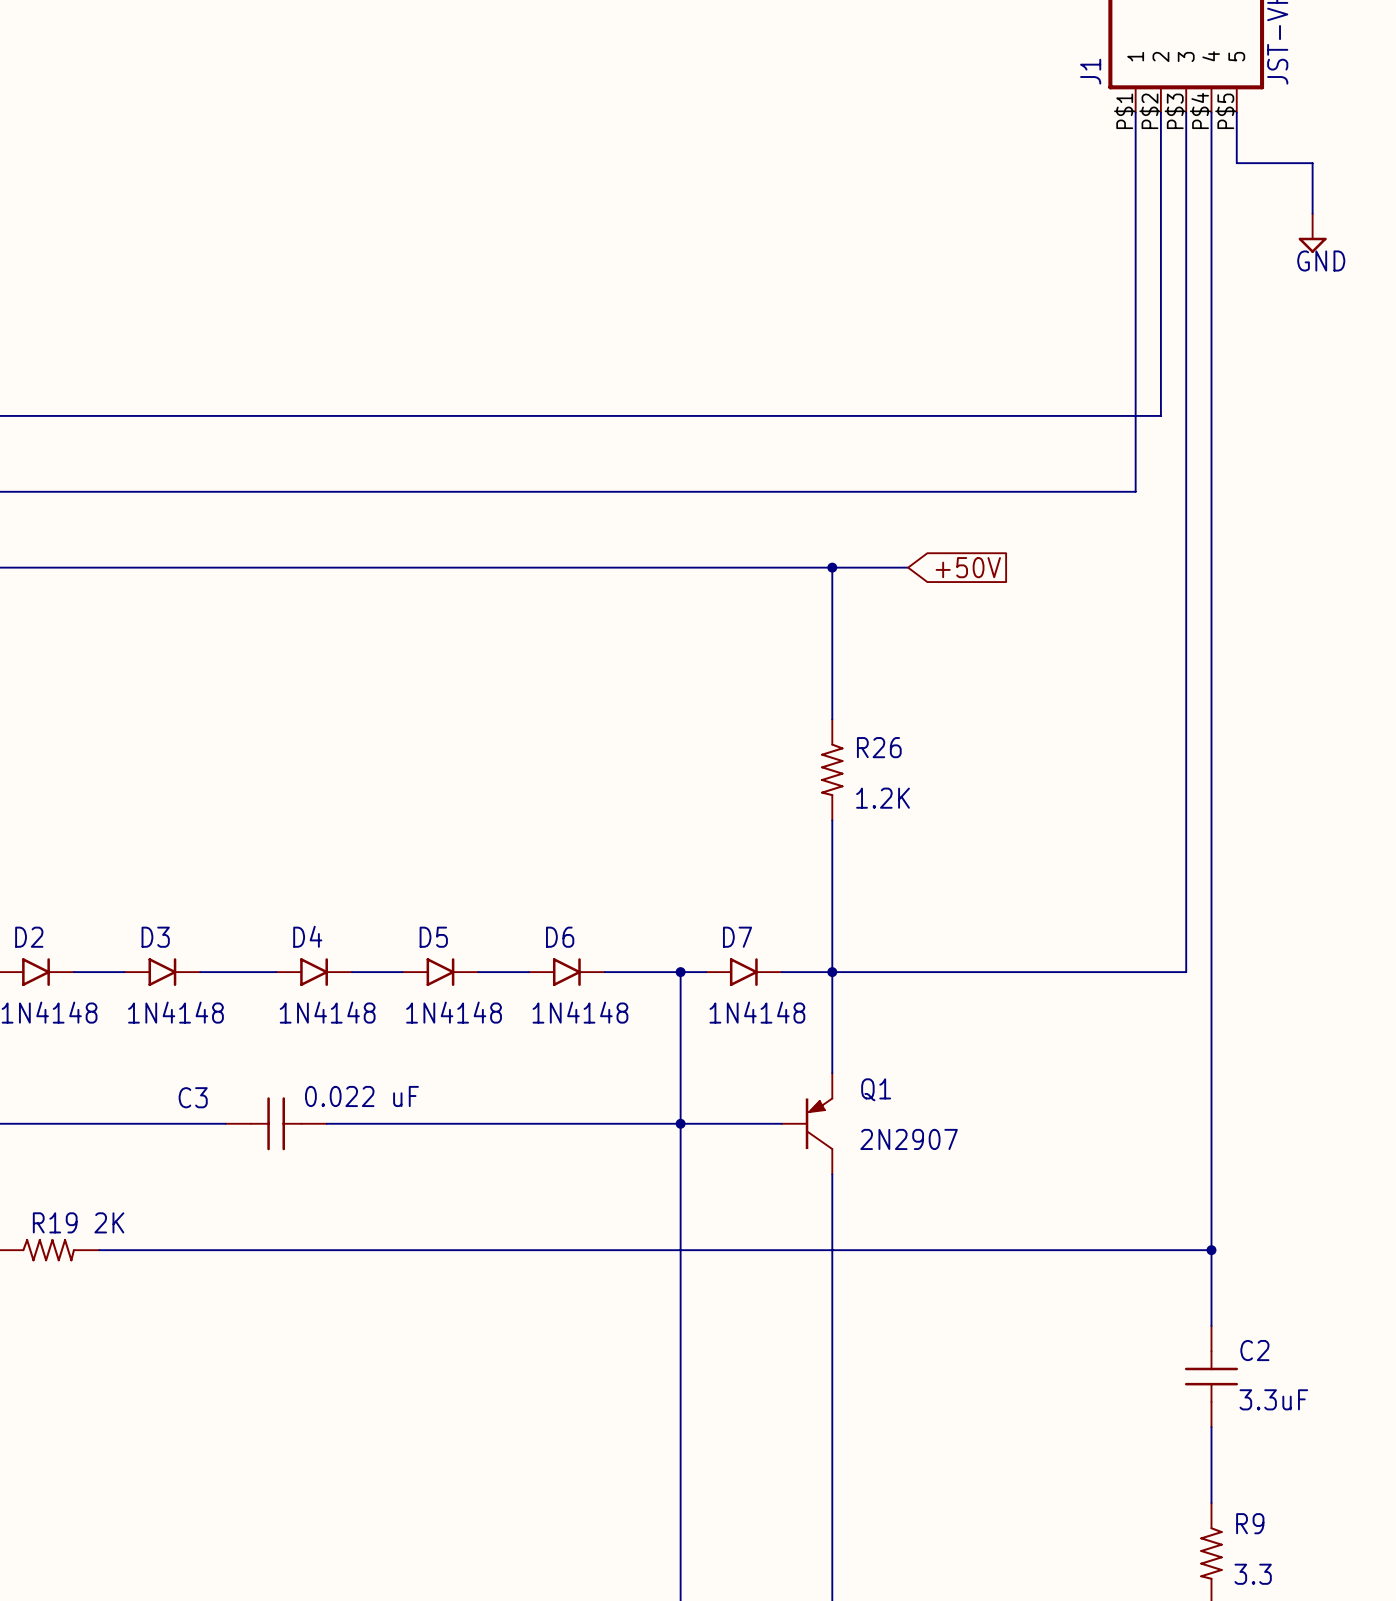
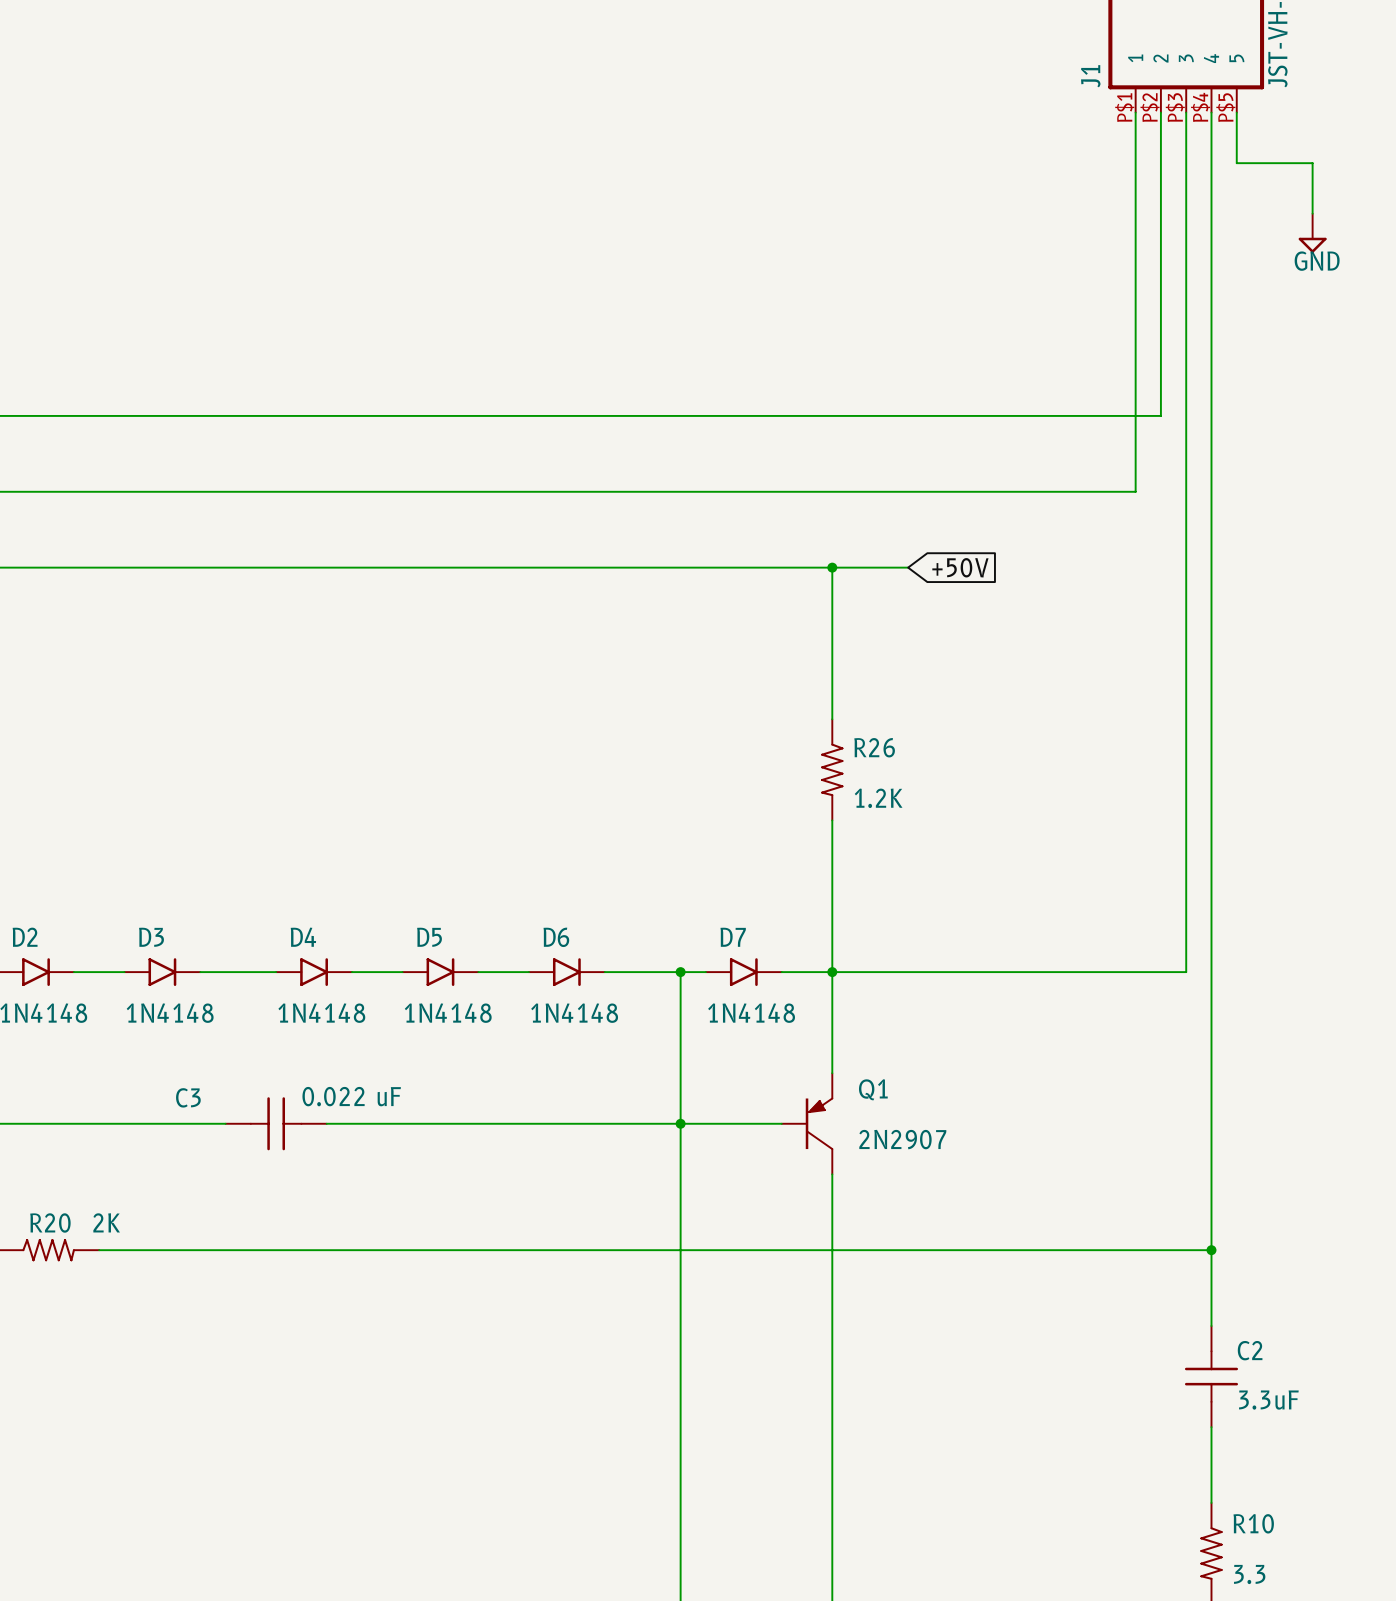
R19 name: R19 (55, 1222) -> R20 (50, 1223)
R9 name: R9 (1250, 1523) -> R10 (1253, 1523)

